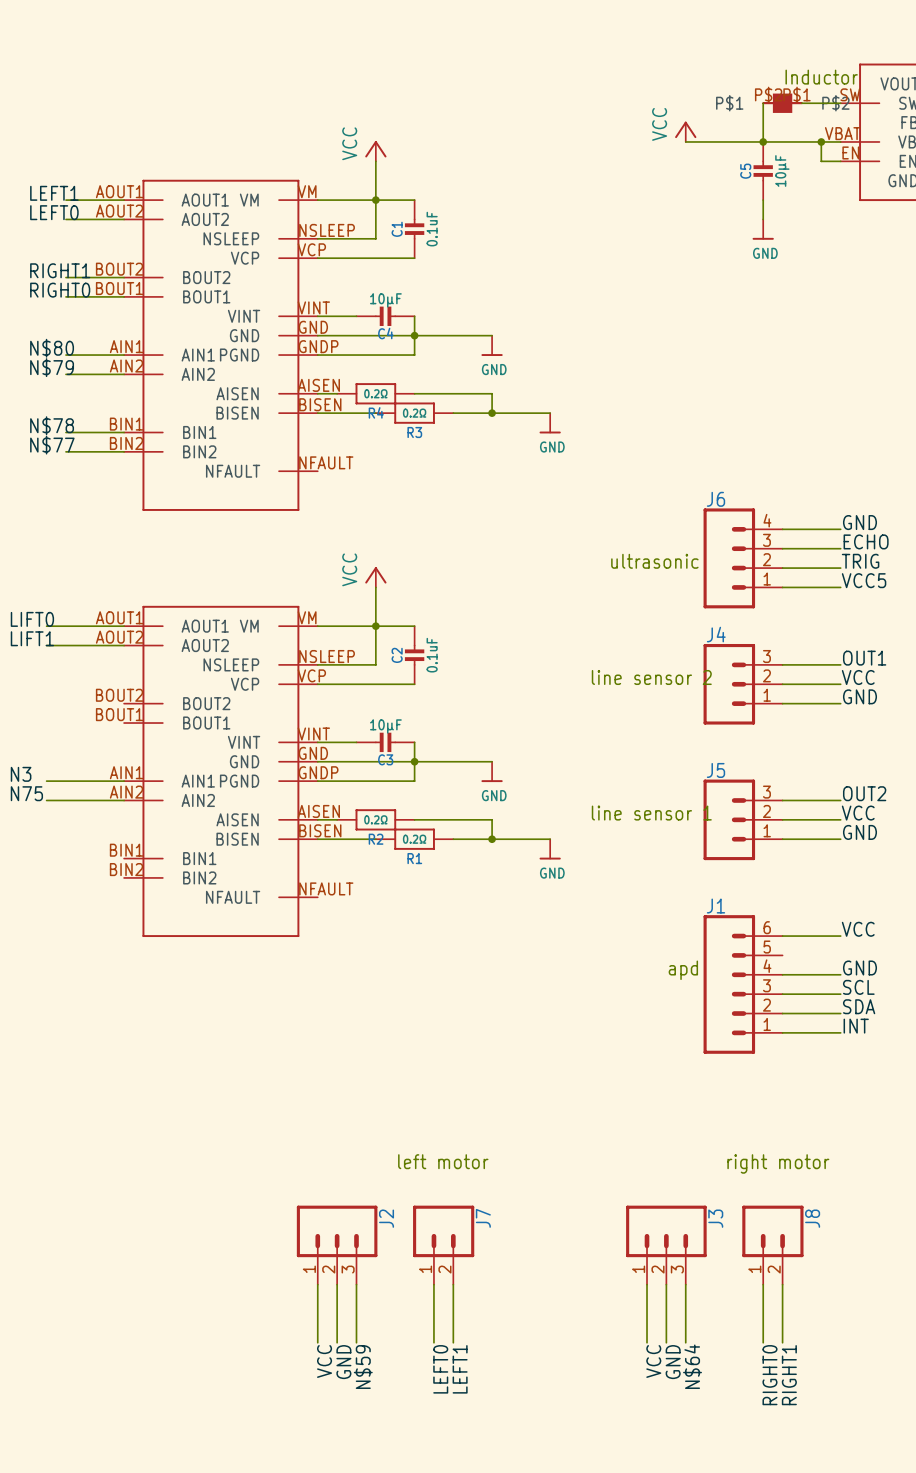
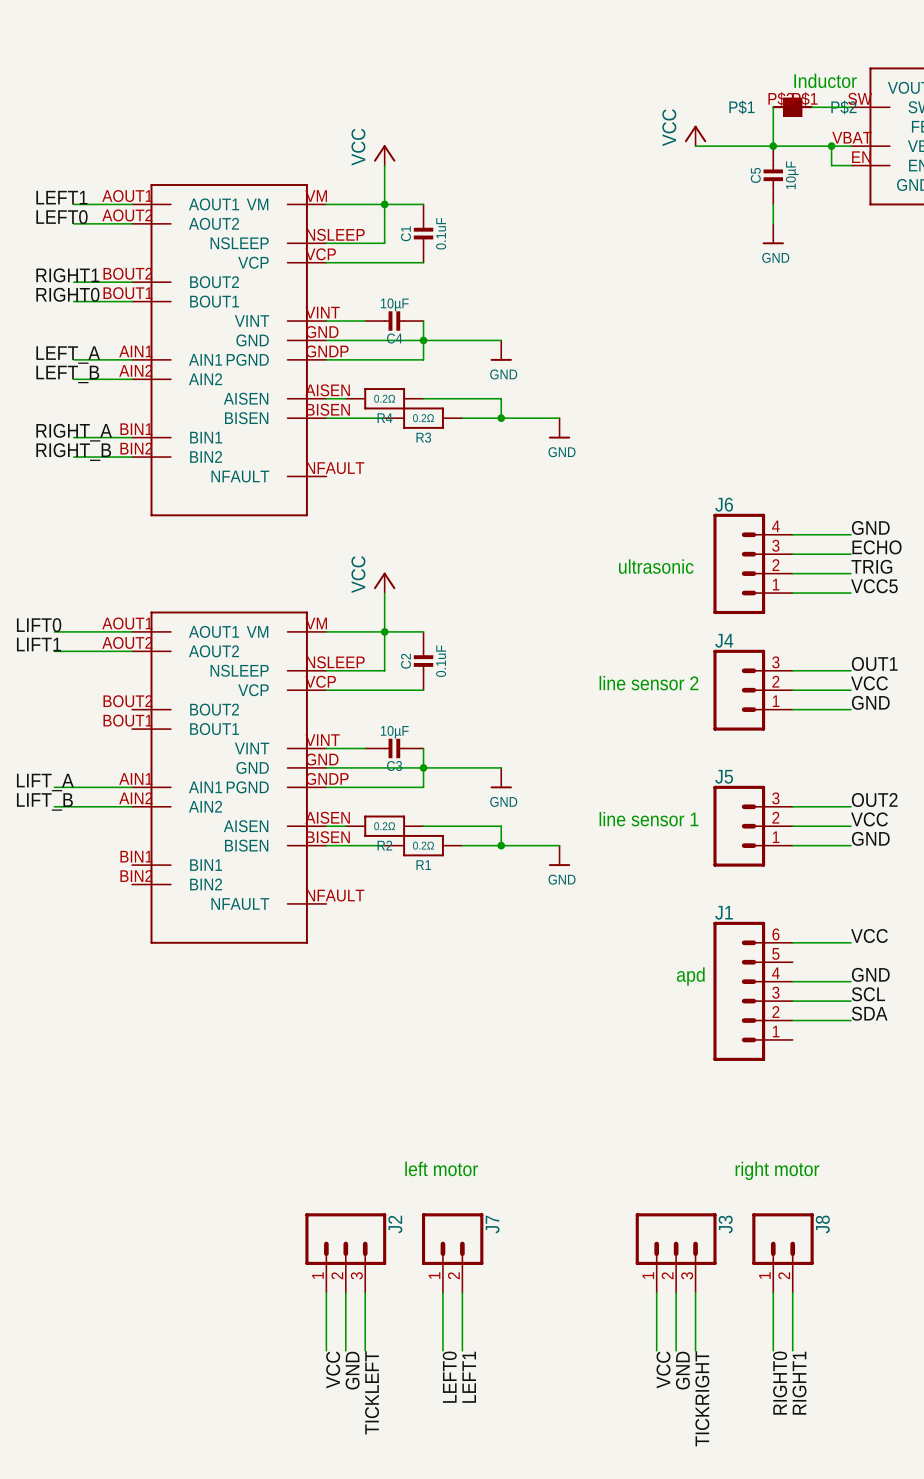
label: N$80 (52, 348) -> LEFT_A (68, 355)
label: N$79 (52, 367) -> LEFT_B (67, 374)
label: N$78 (52, 425) -> RIGHT_A (74, 432)
label: N$77 (52, 445) -> RIGHT_B (73, 452)
label: N3 (21, 774) -> LIFT_A (45, 782)
label: N75 (26, 793) -> LIFT_B (44, 801)
label: INT (856, 1026) -> none
wire: (782, 1032) (840, 1032) -> none
label: N$64 (692, 1366) -> TICKRIGHT (702, 1398)
label: N$59 (363, 1367) -> TICKLEFT (372, 1392)

